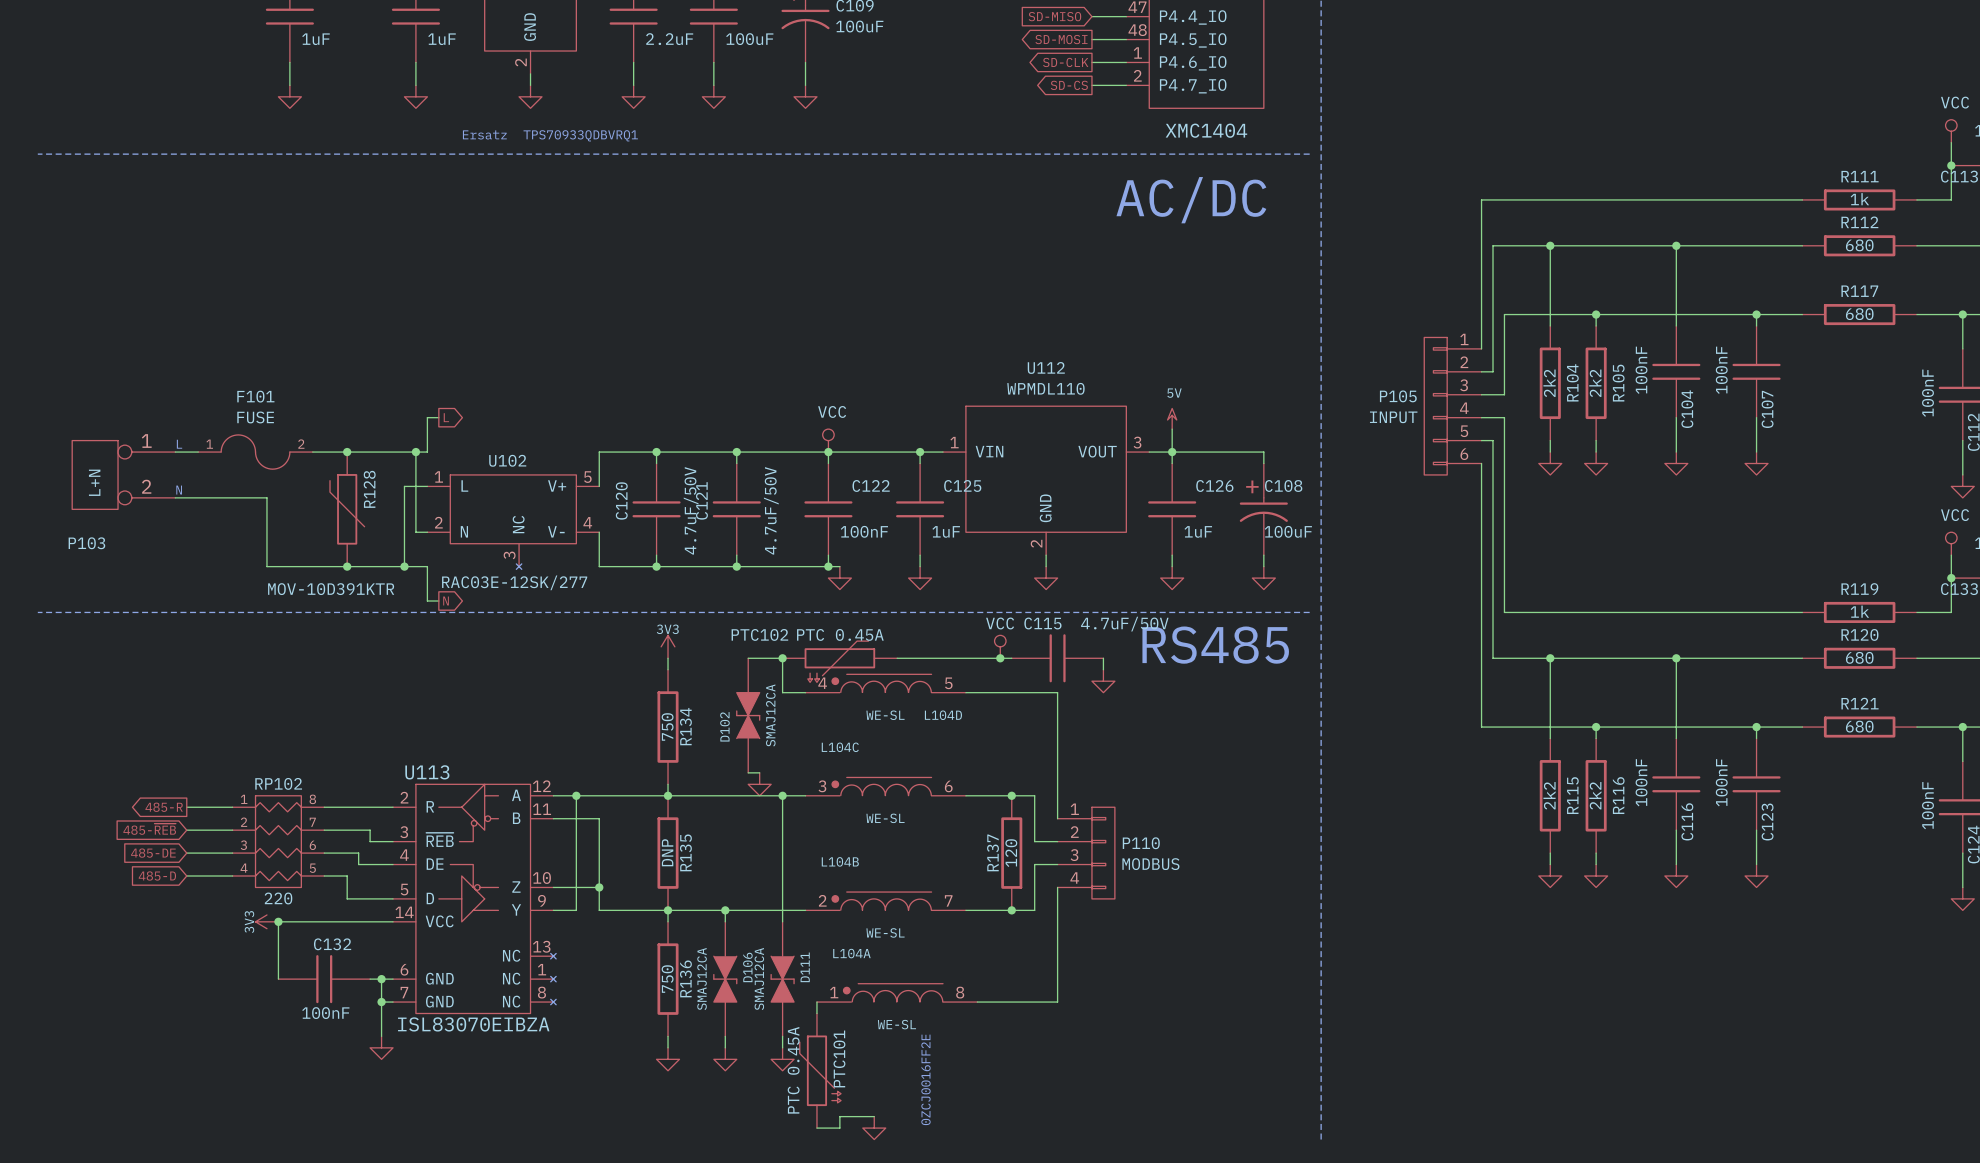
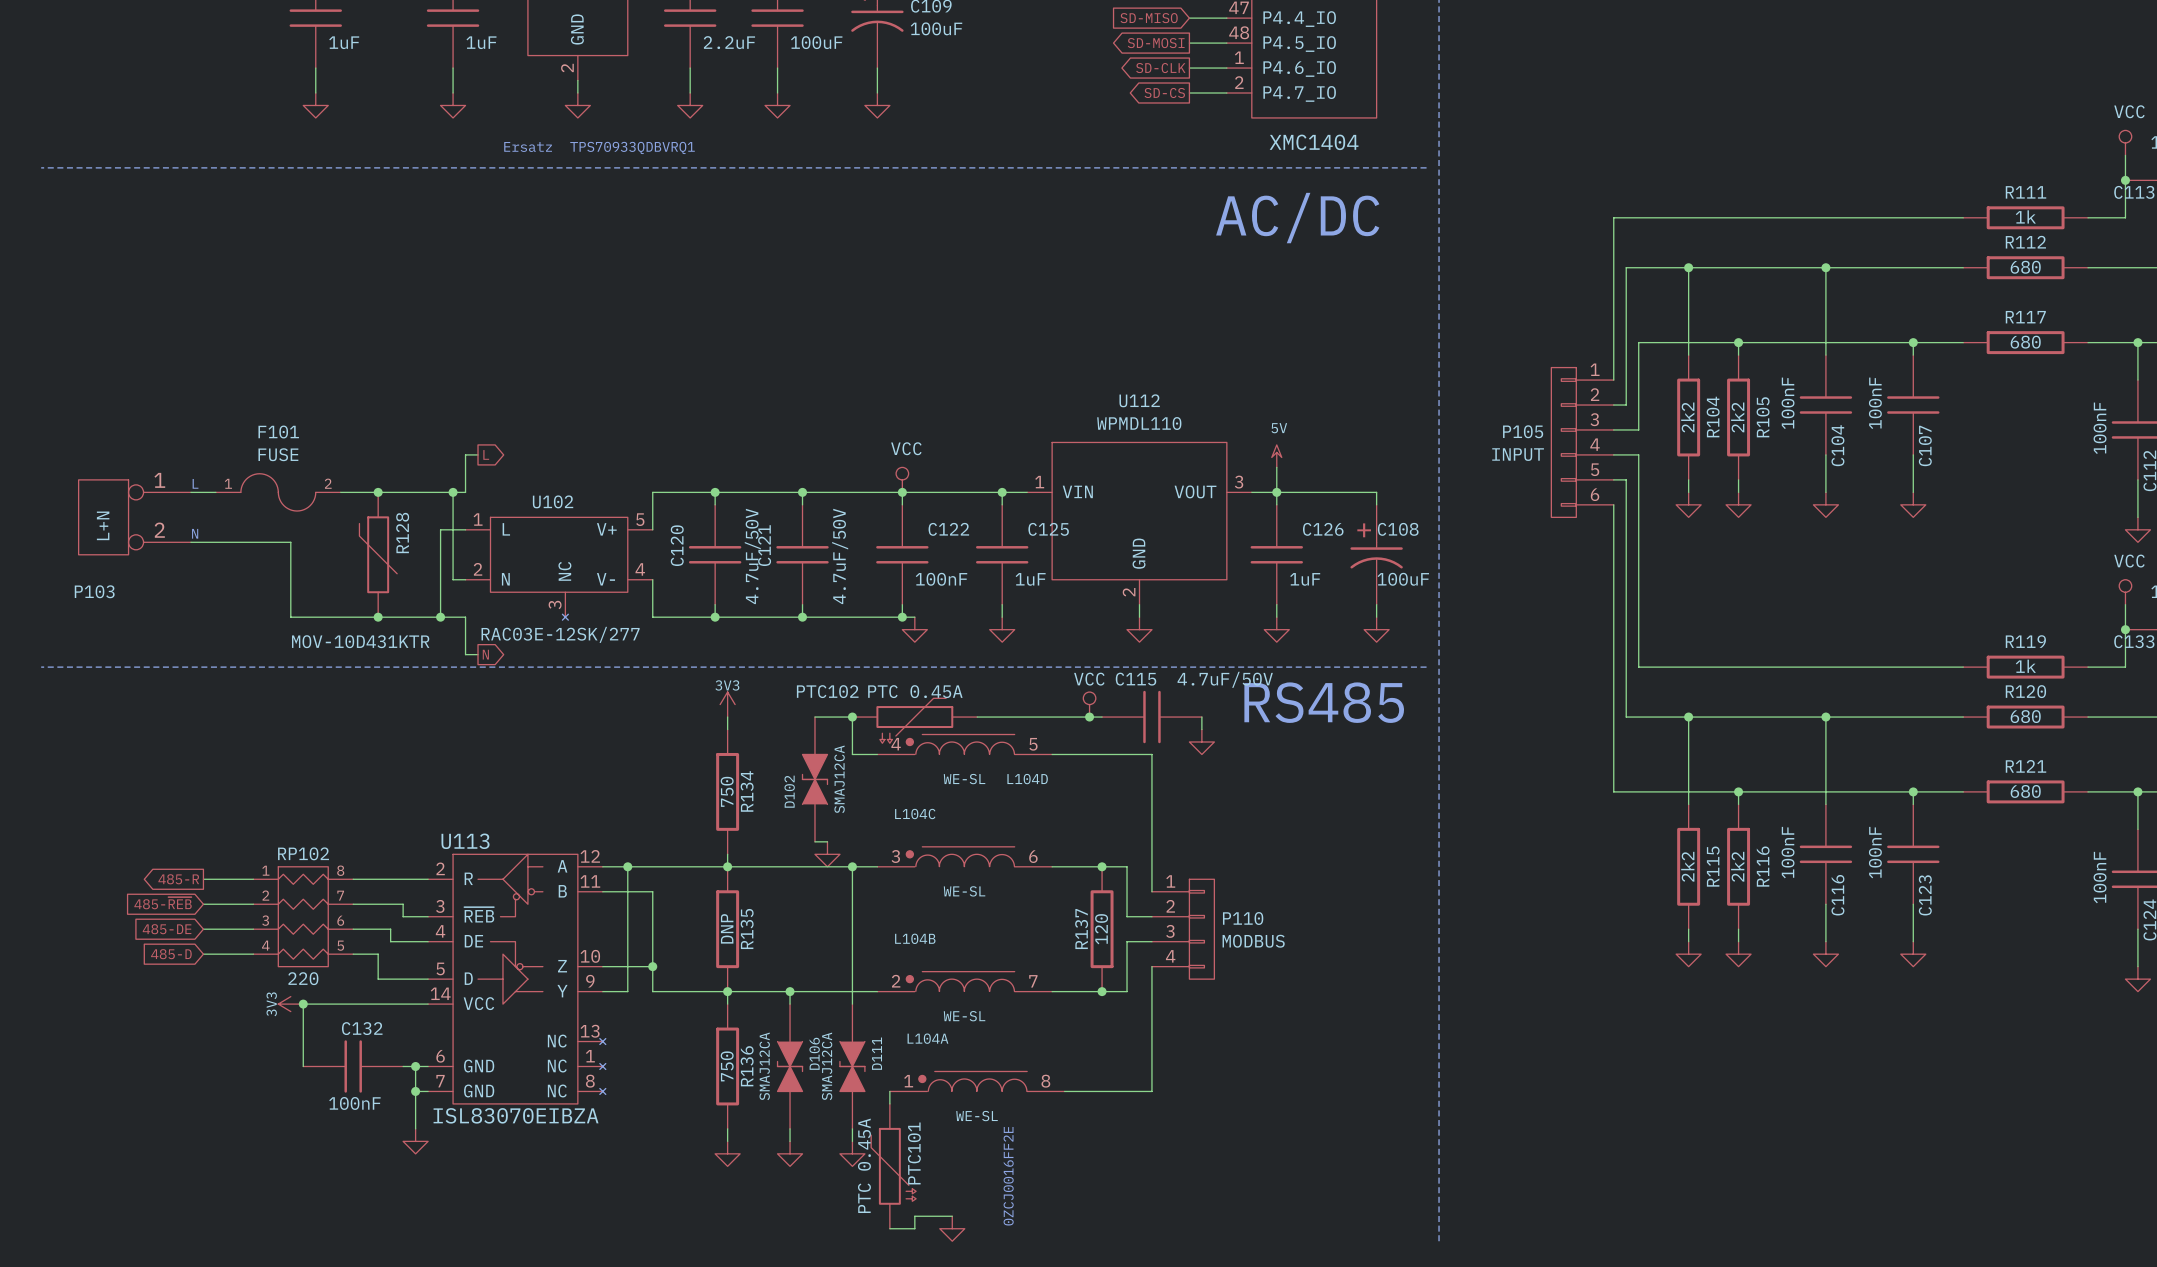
R128 value: MOV-10D391KTR (331, 589) -> MOV-10D431KTR (360, 641)

